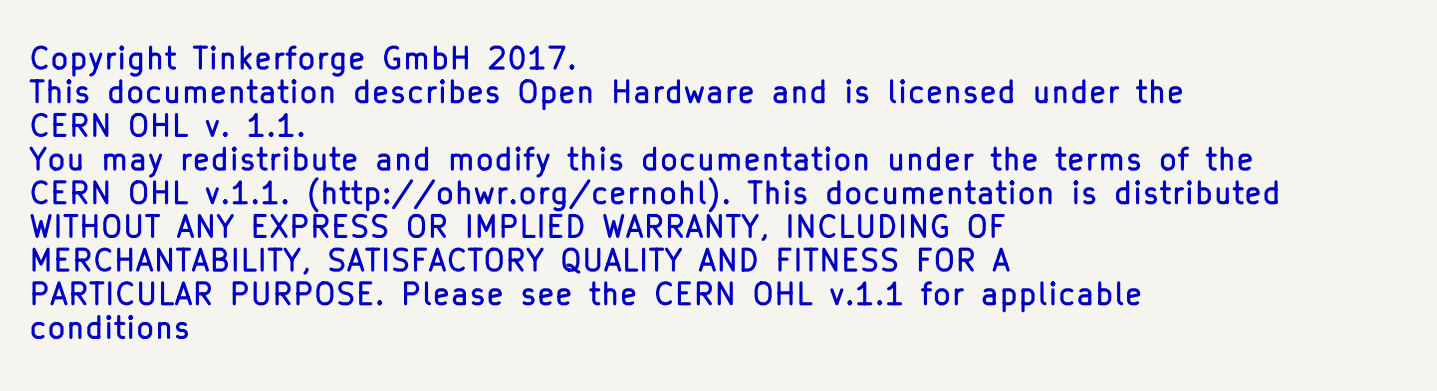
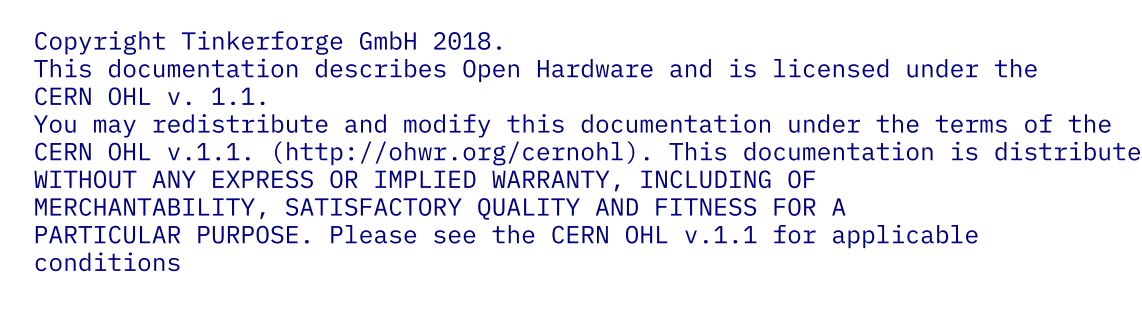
text: Copyright Tinkerforge GmbH 2017. (302, 61) -> Copyright Tinkerforge GmbH 2018. (268, 42)

